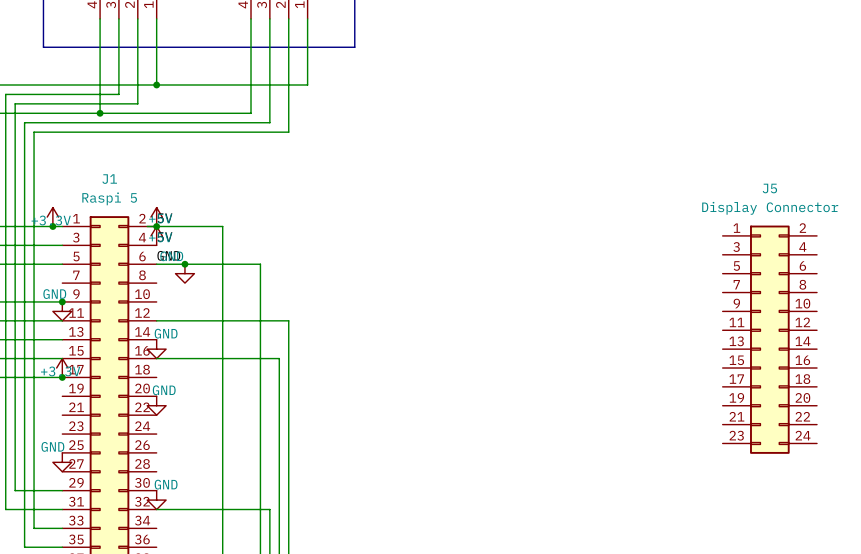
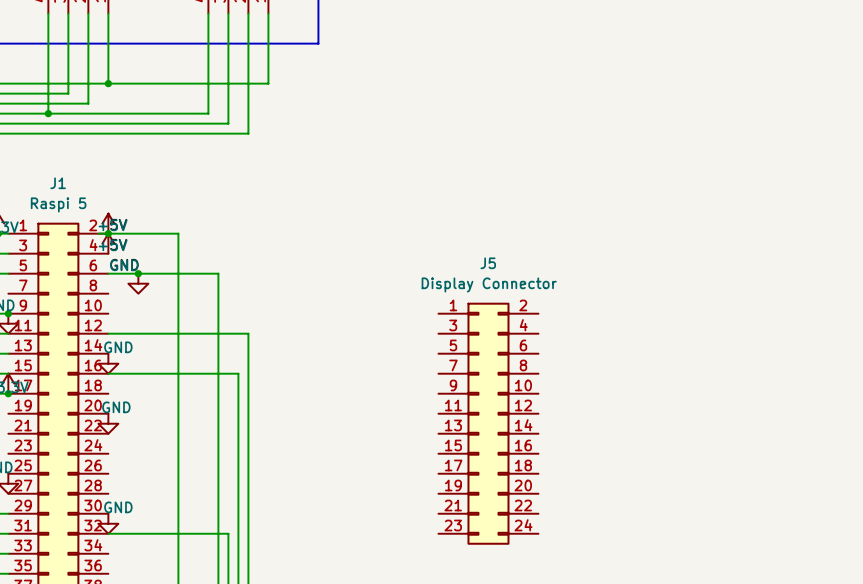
J5 position: (769, 339) -> (488, 423)

